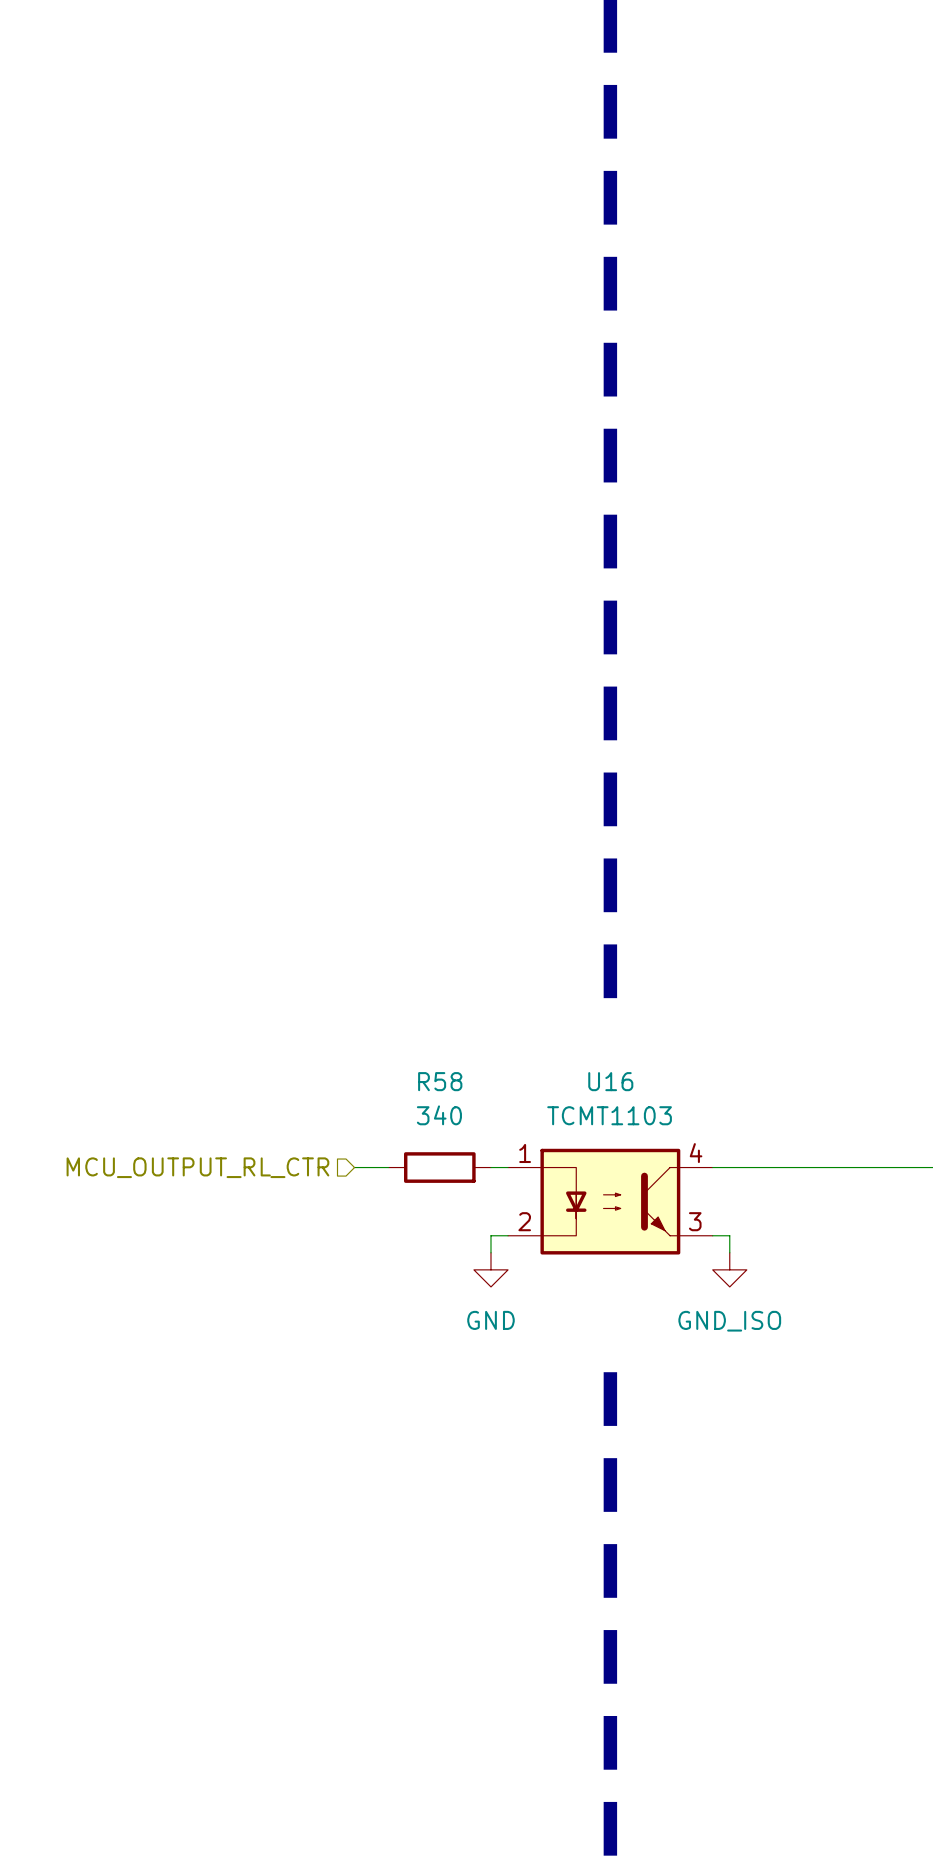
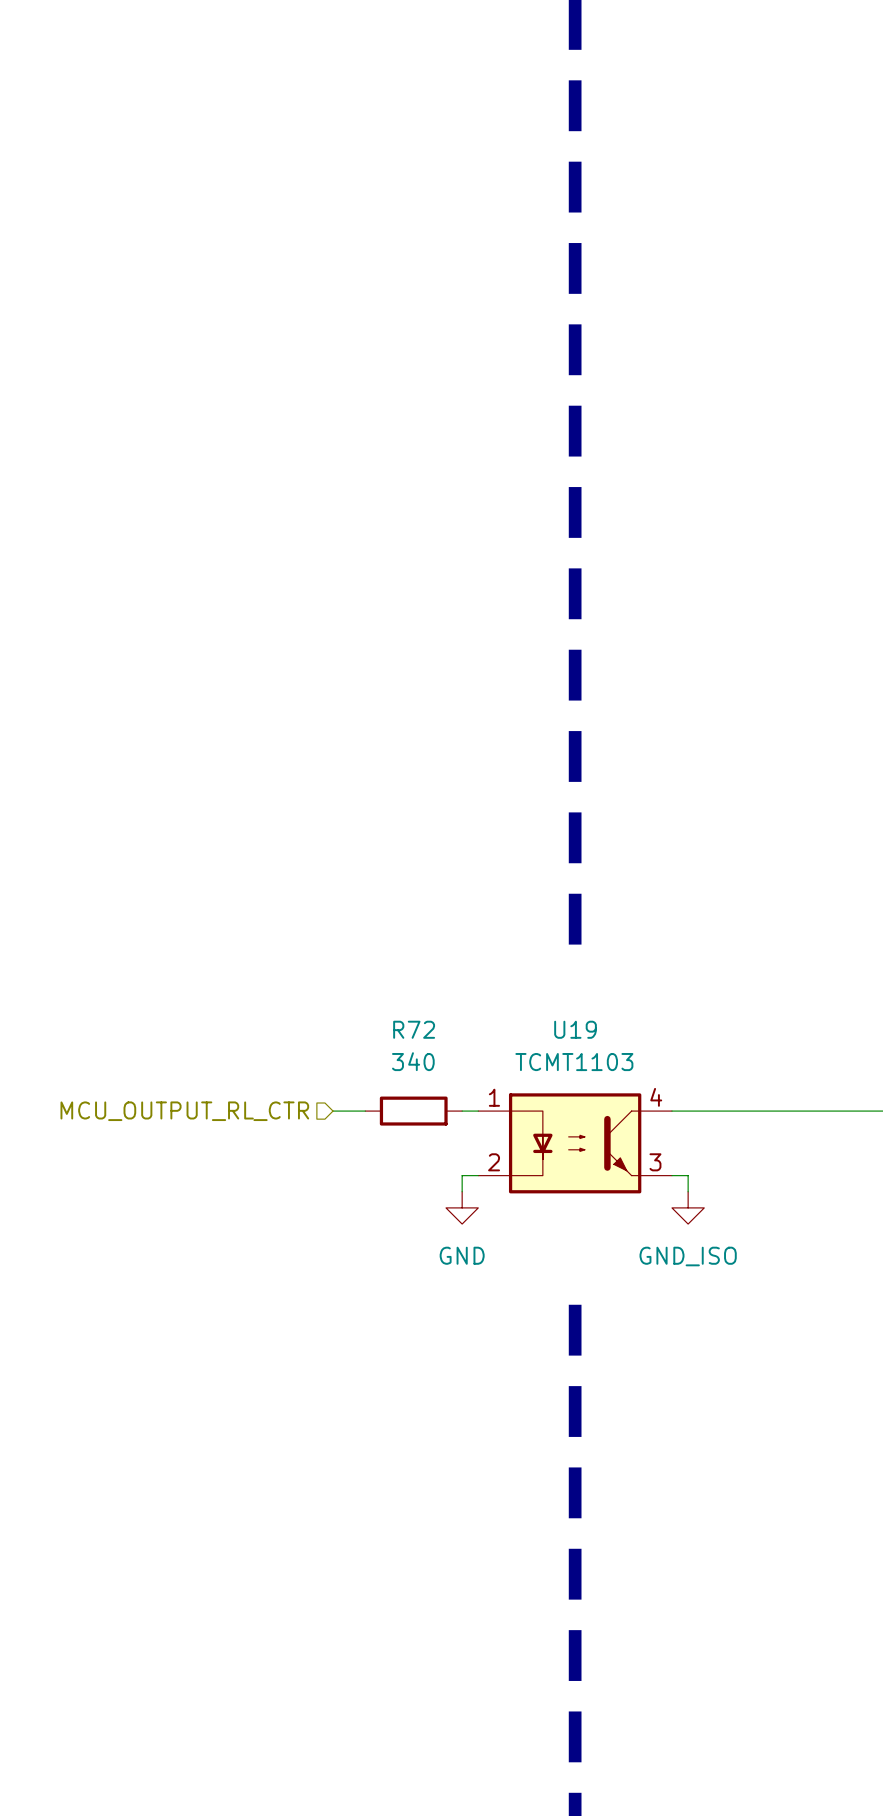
R58 name: R58 (440, 1081) -> R72 (414, 1029)
U16 name: U16 (610, 1081) -> U19 (575, 1029)

